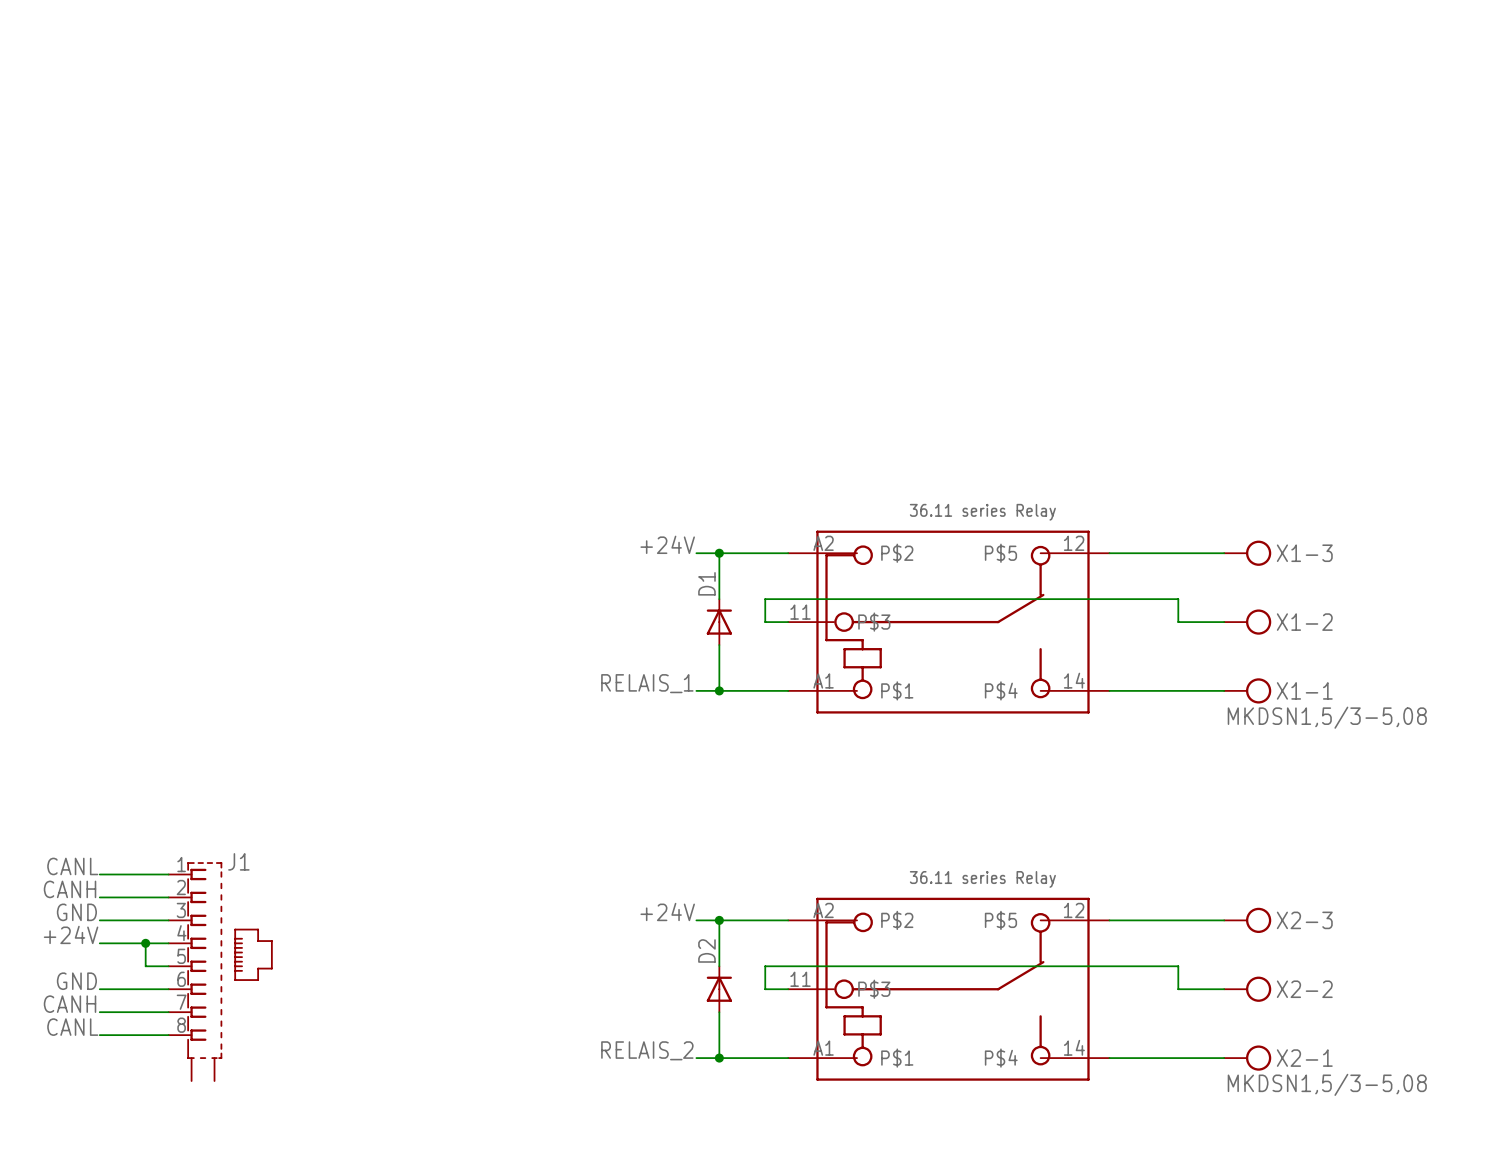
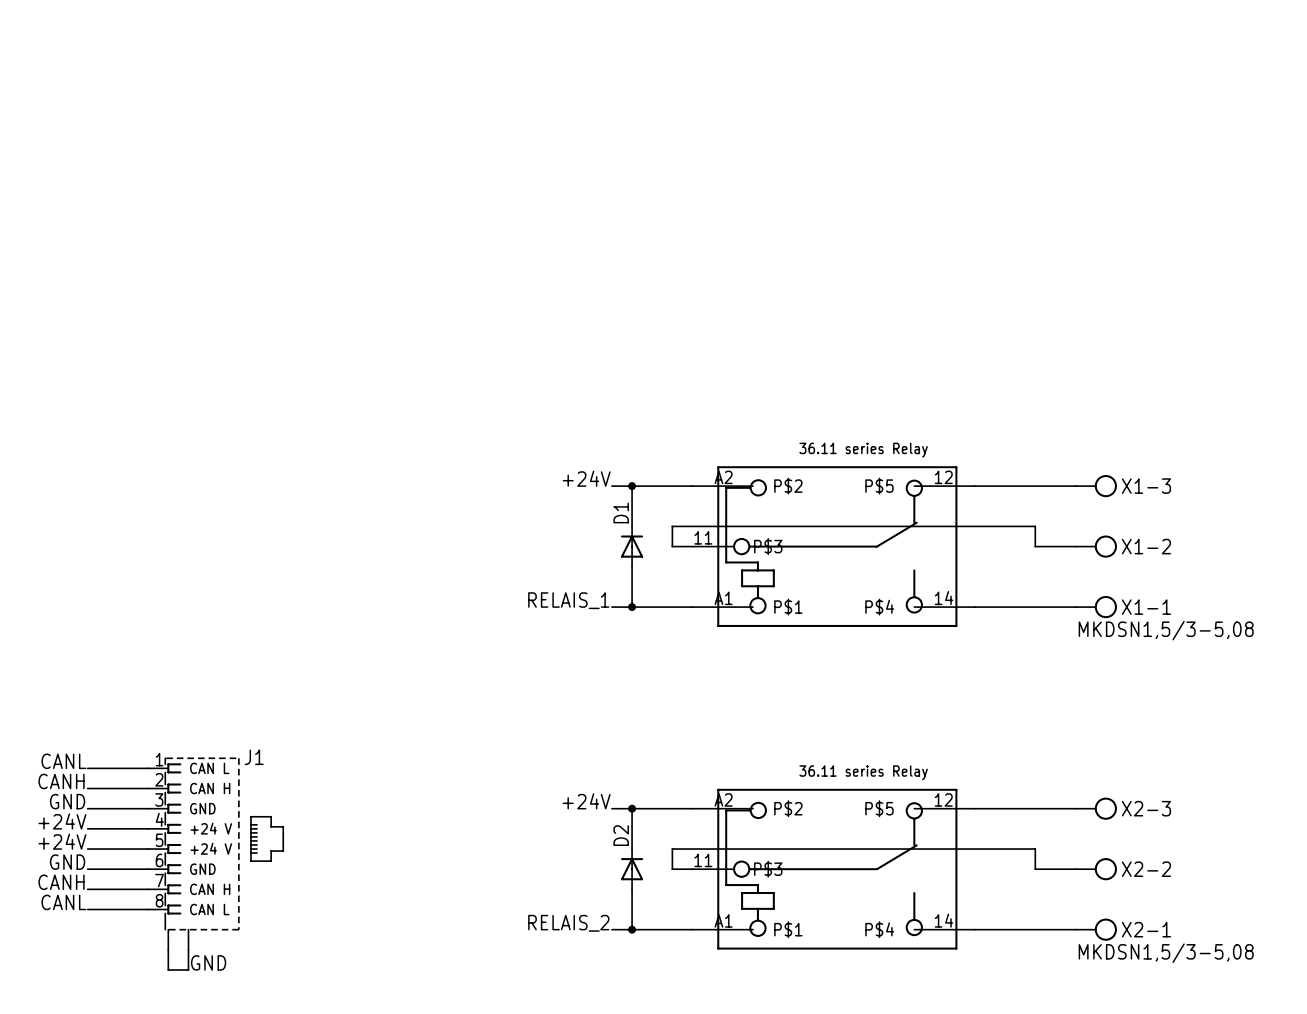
J1 name position: J1 (238, 861) -> J1 (254, 757)
J1 symbol: [168, 862, 273, 1082] -> [148, 757, 285, 950]
wire: (145, 943) (145, 966) -> (87, 849) (127, 849)
junction: (145, 943) -> none
label: none -> +24V (62, 841)
wire: none -> (168, 949) (168, 969) (188, 969) (188, 949)
label: none -> GND (208, 962)

